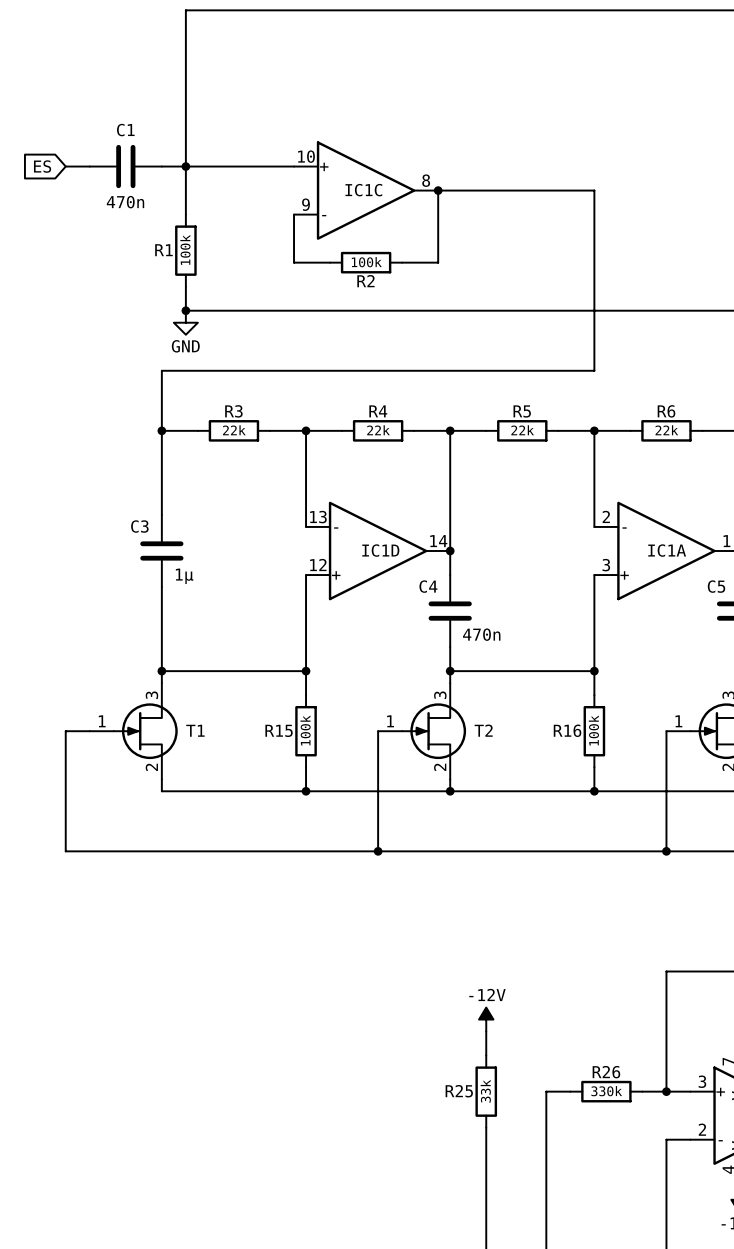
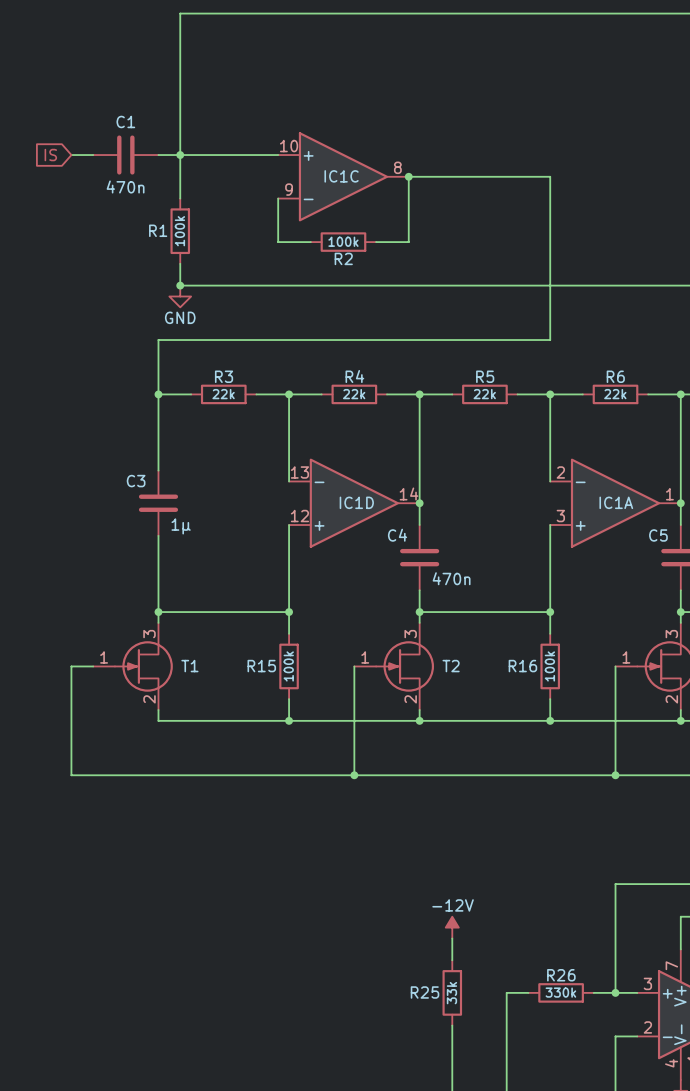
global label: ES (42, 166) -> IS (50, 155)

